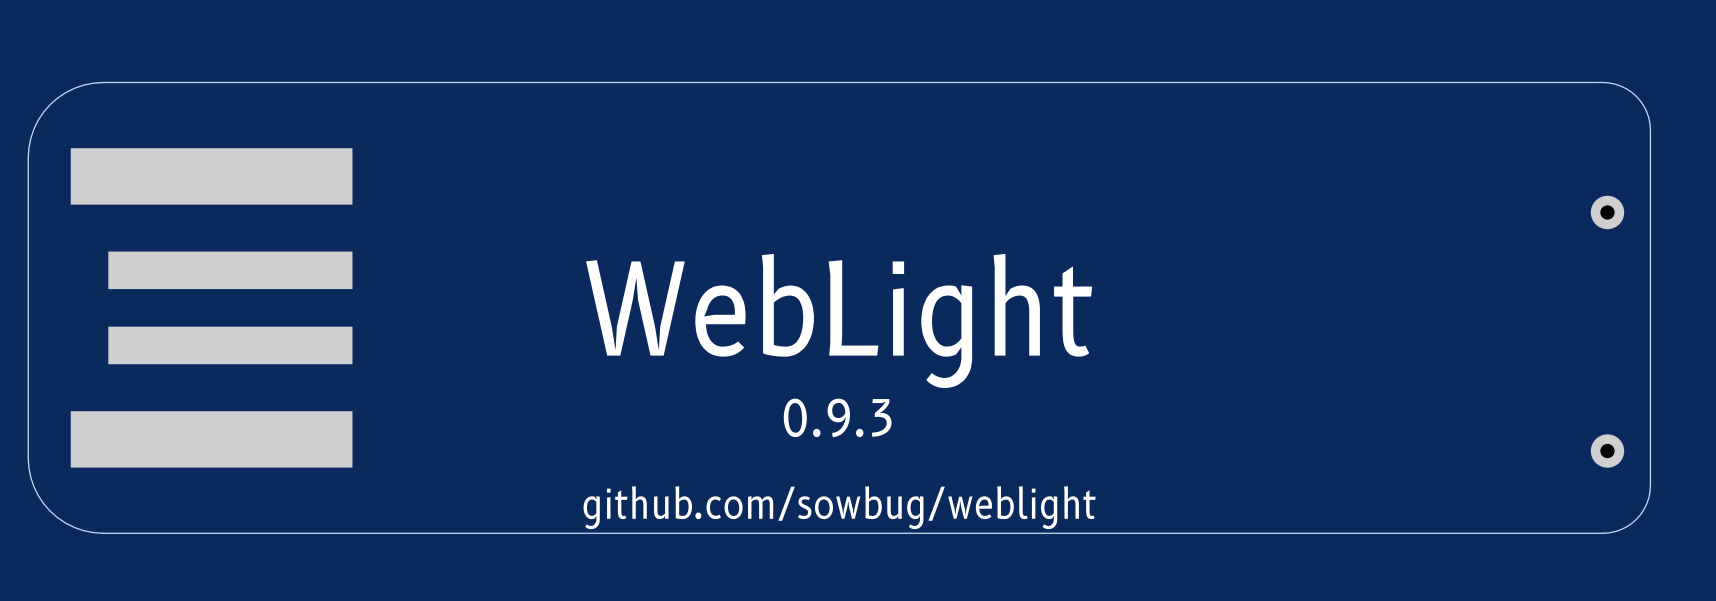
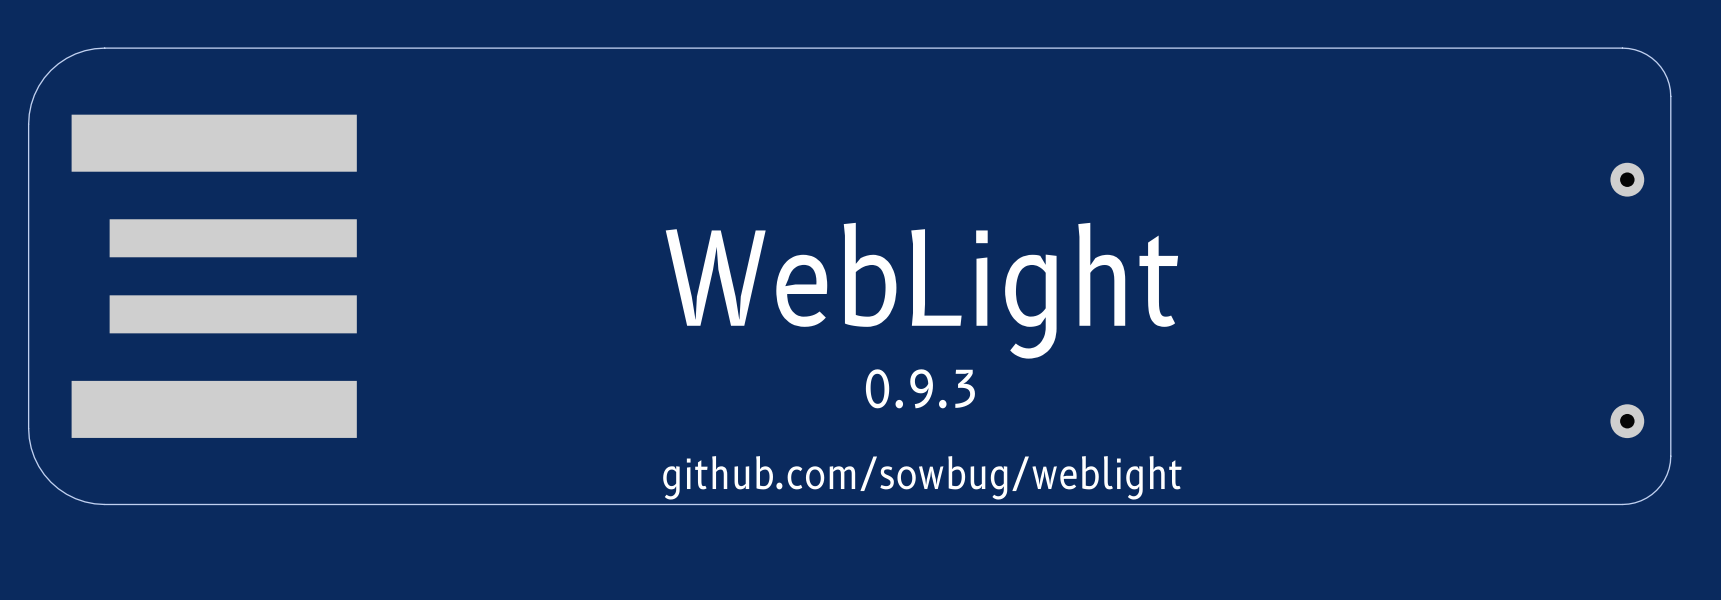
text position: WebLight (839, 320) -> WebLight (921, 290)
text position: 0.9.3 (837, 417) -> 0.9.3 (920, 388)
text position: github.com/sowbug/weblight (839, 507) -> github.com/sowbug/weblight (922, 477)

